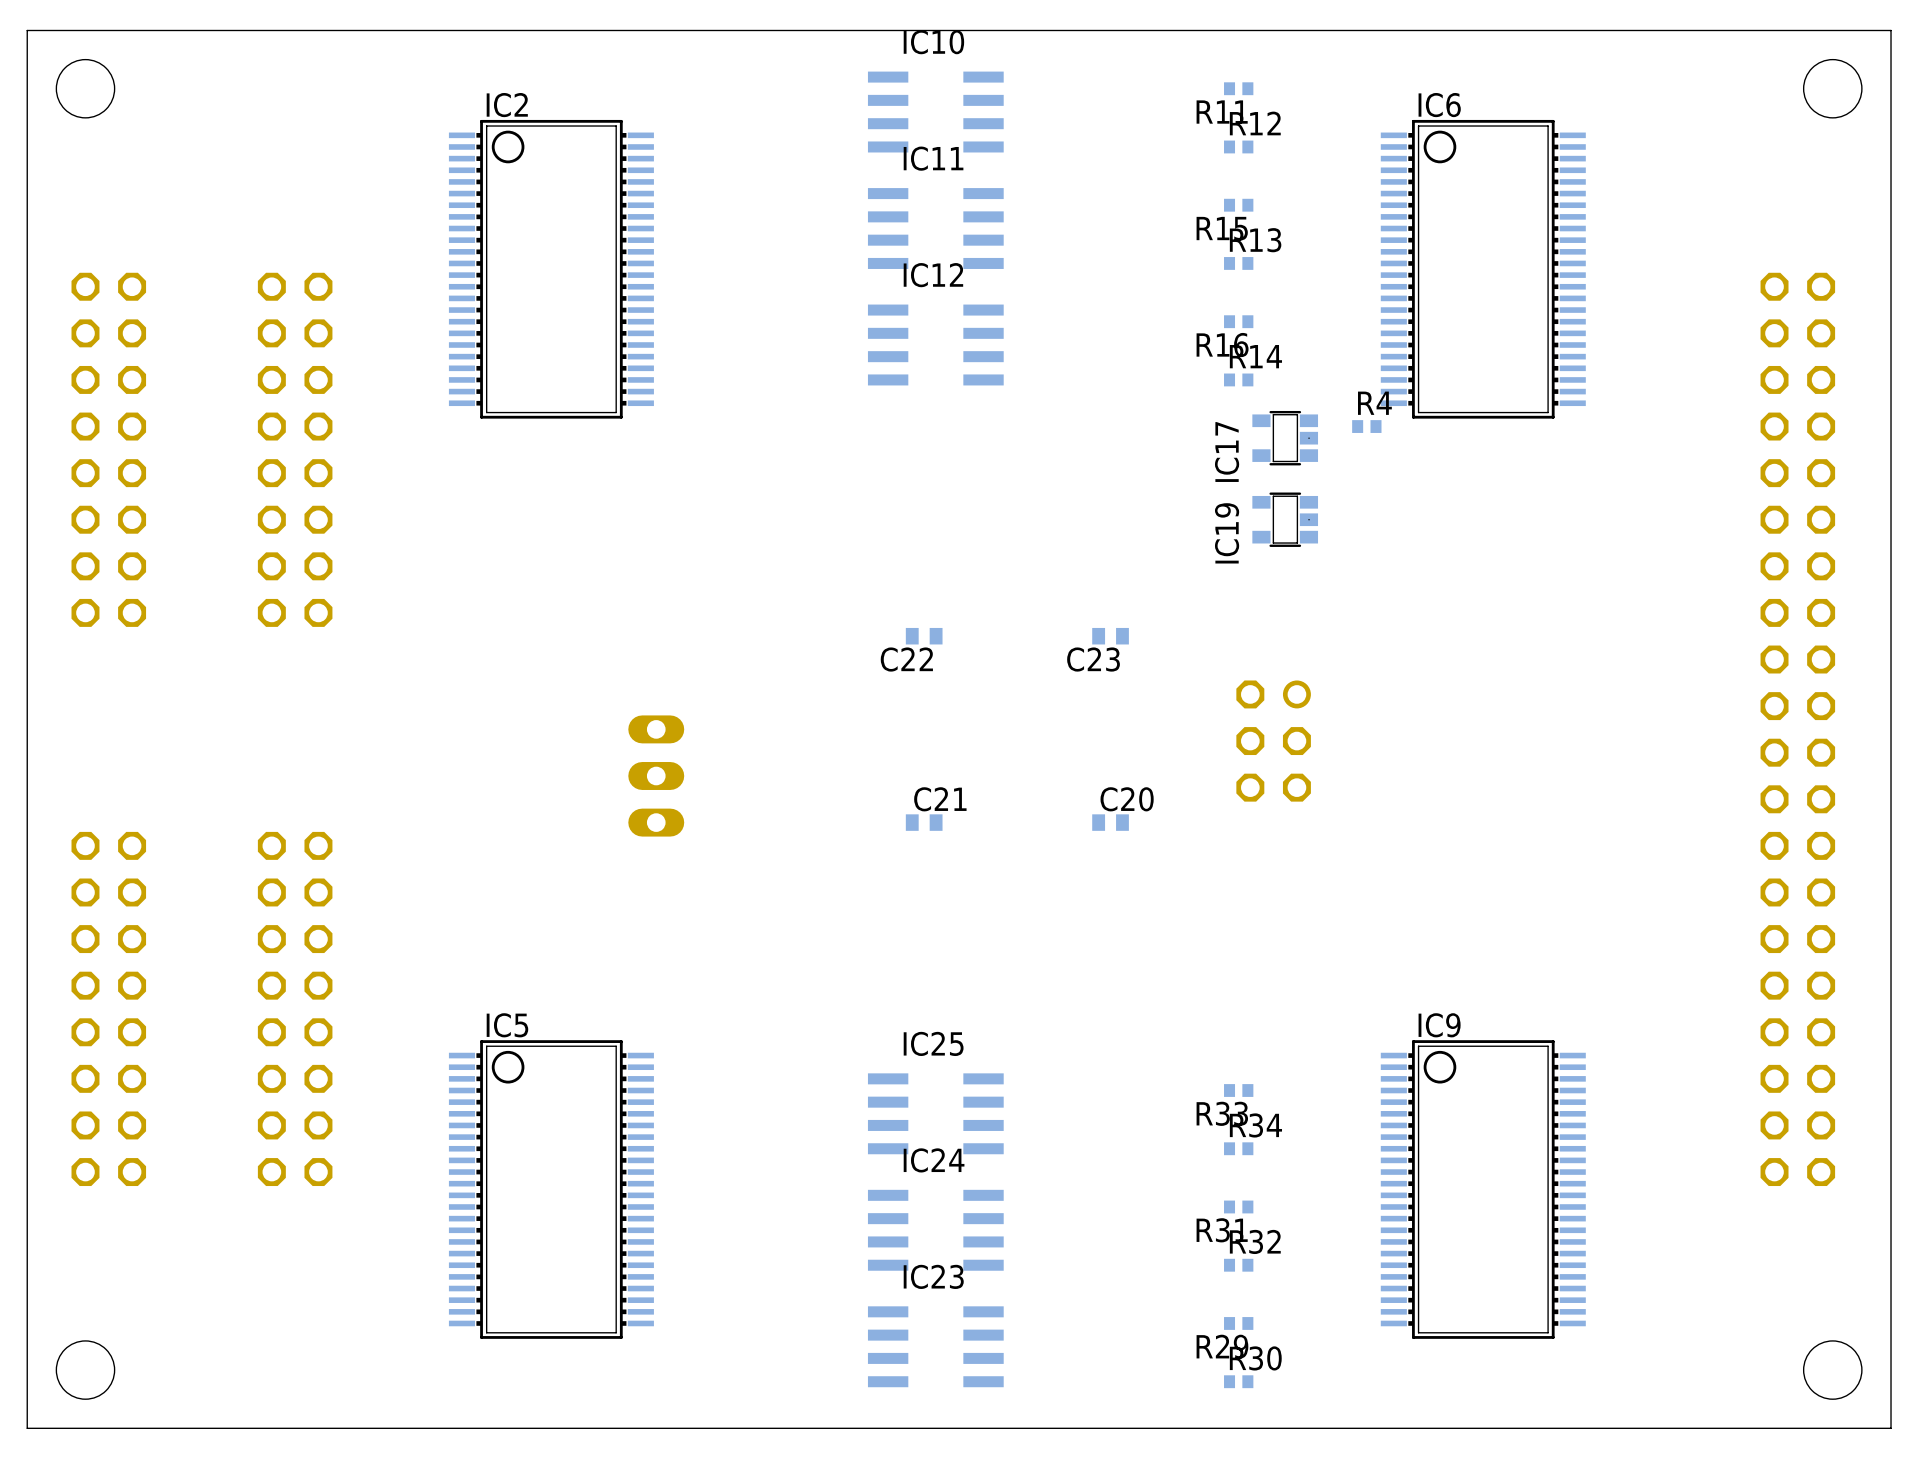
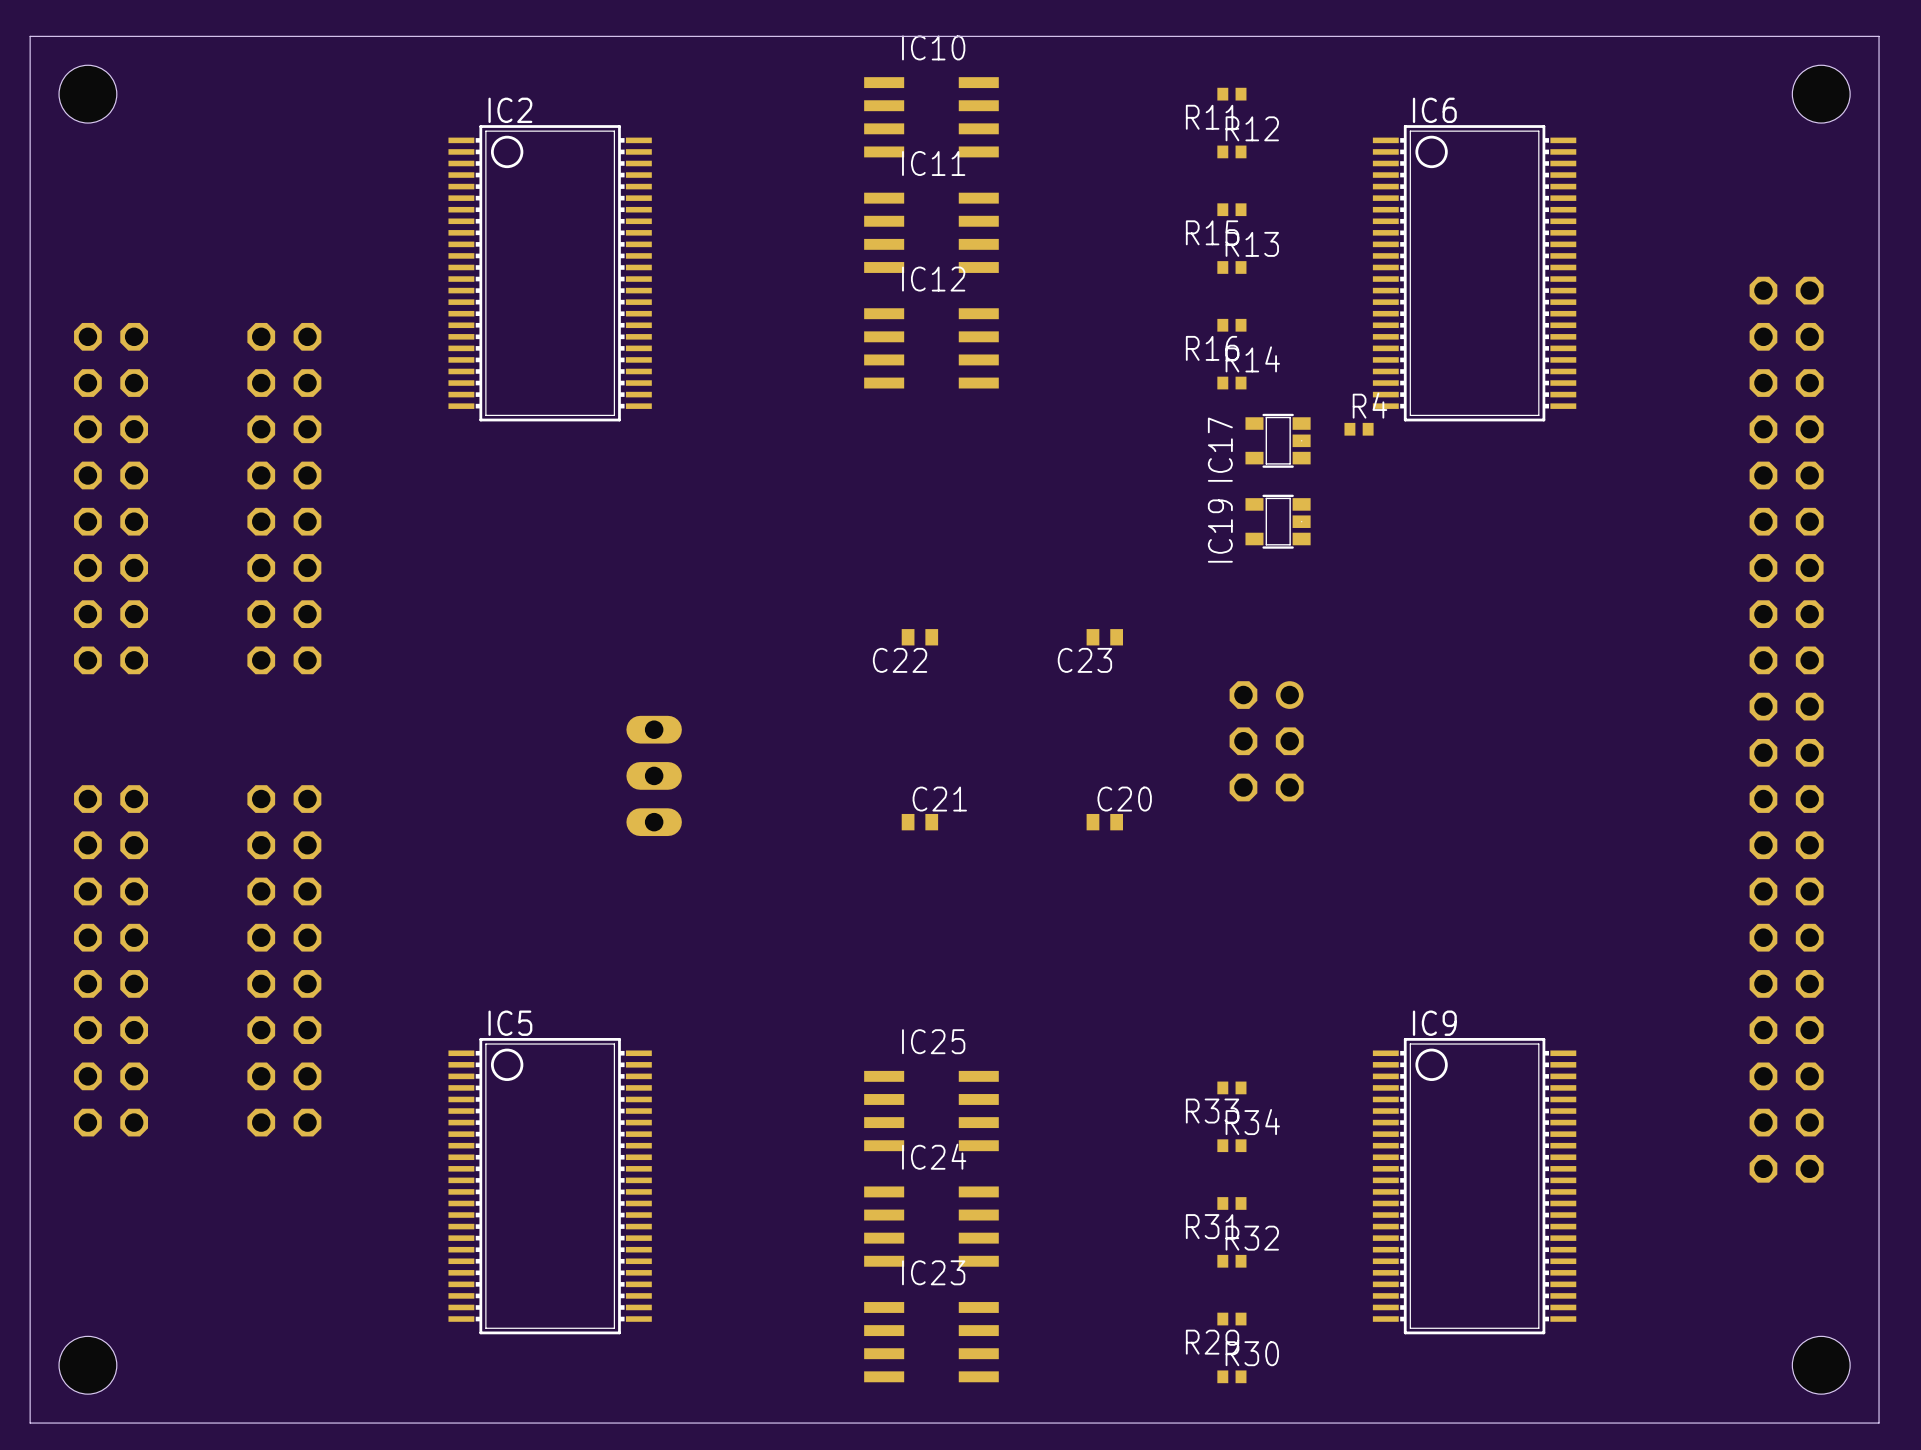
part position: (108, 449) -> (111, 498)
part position: (295, 449) -> (284, 498)
part position: (108, 1008) -> (111, 960)
part position: (295, 1008) -> (284, 960)

